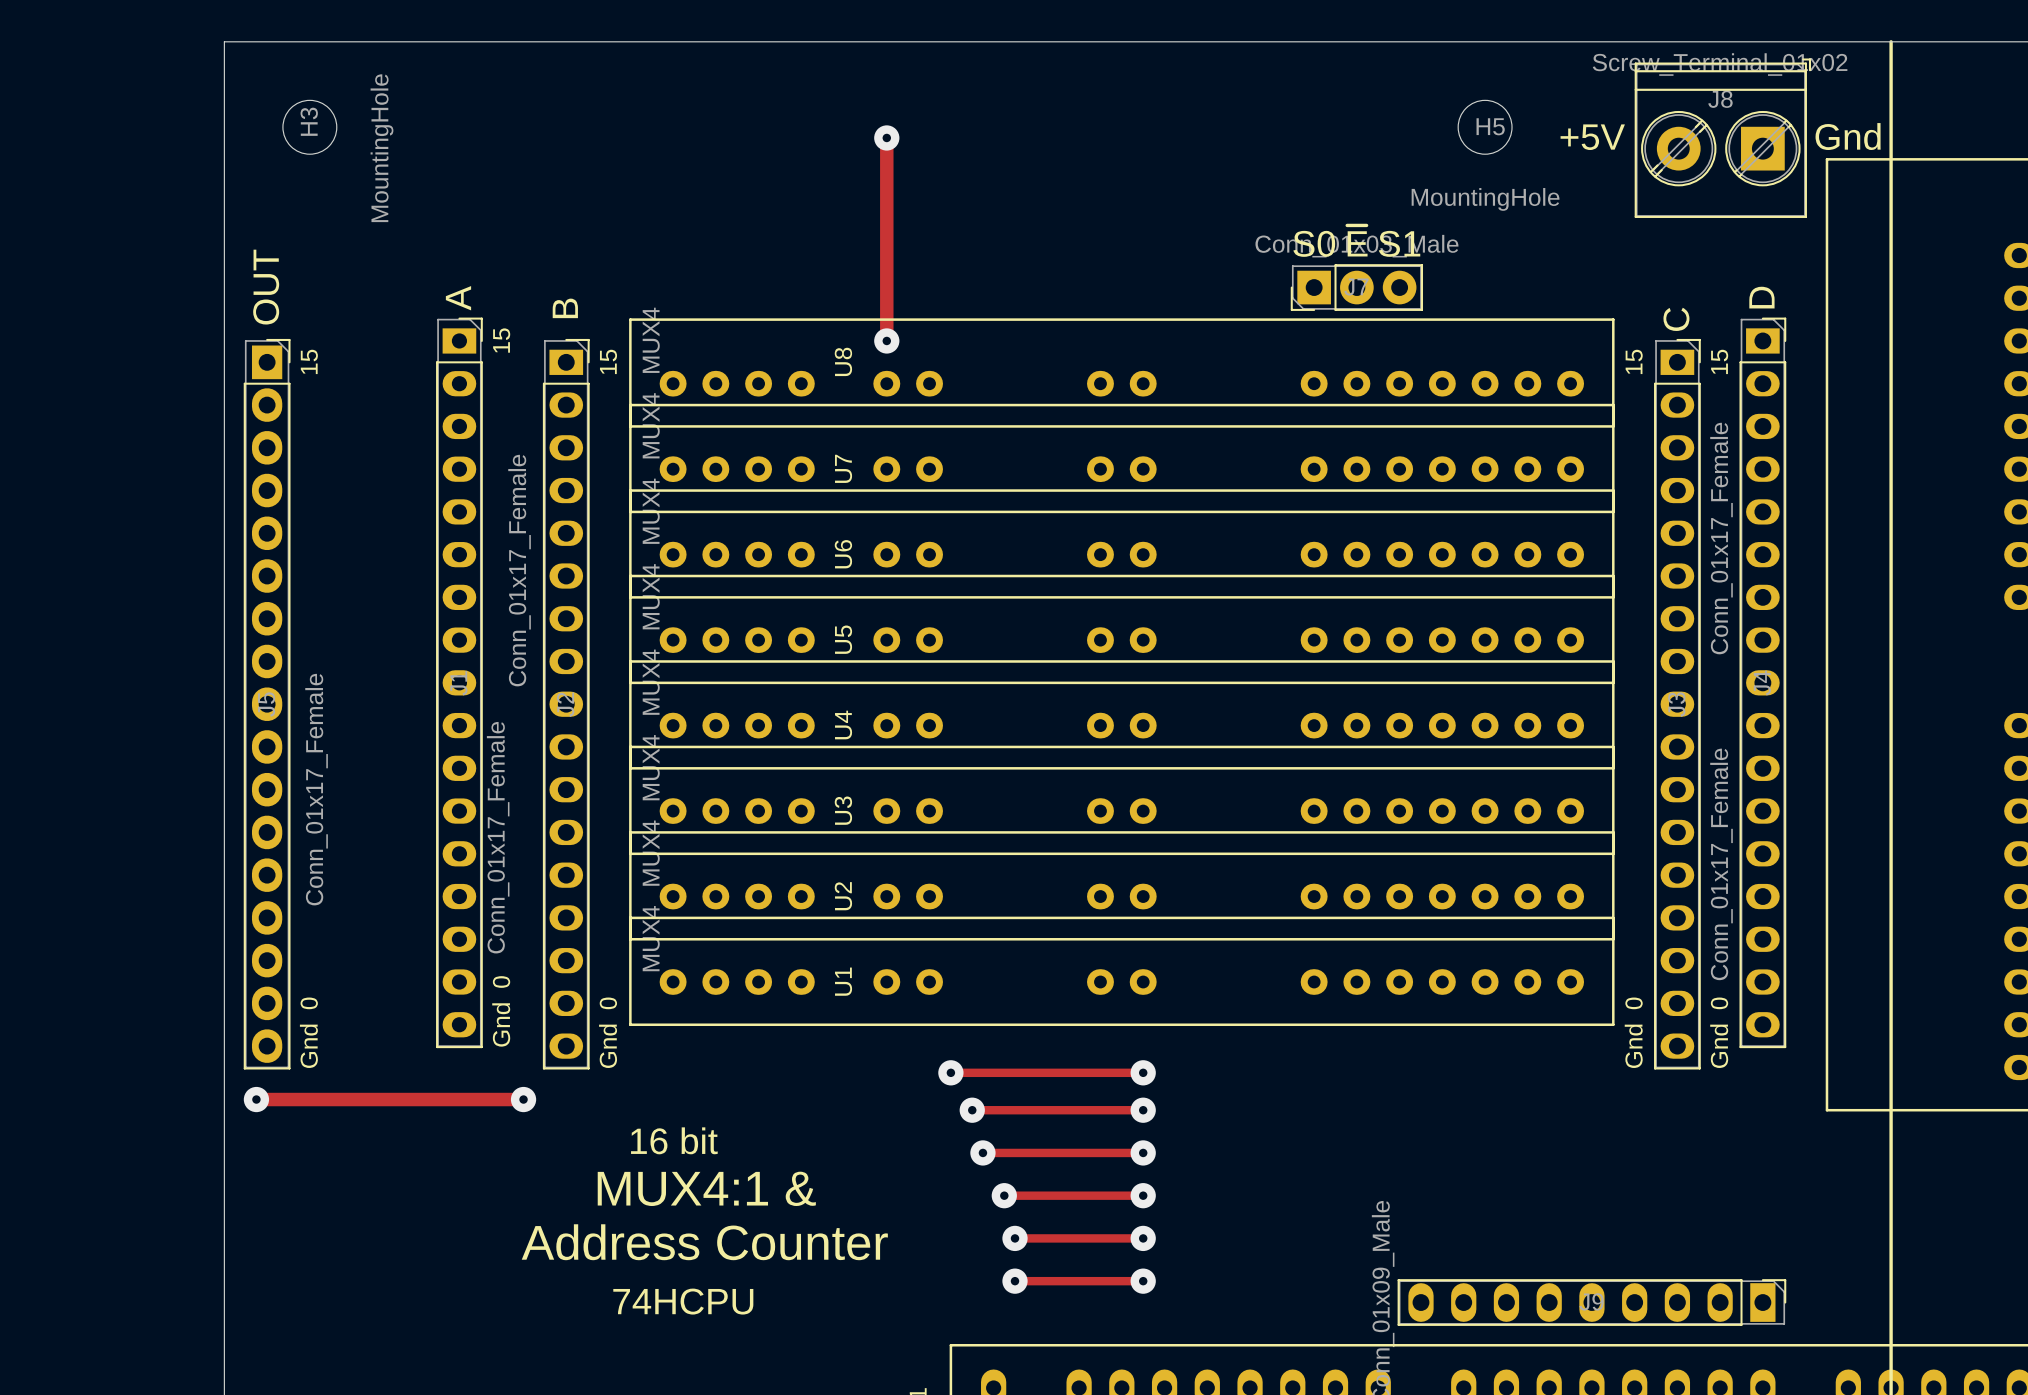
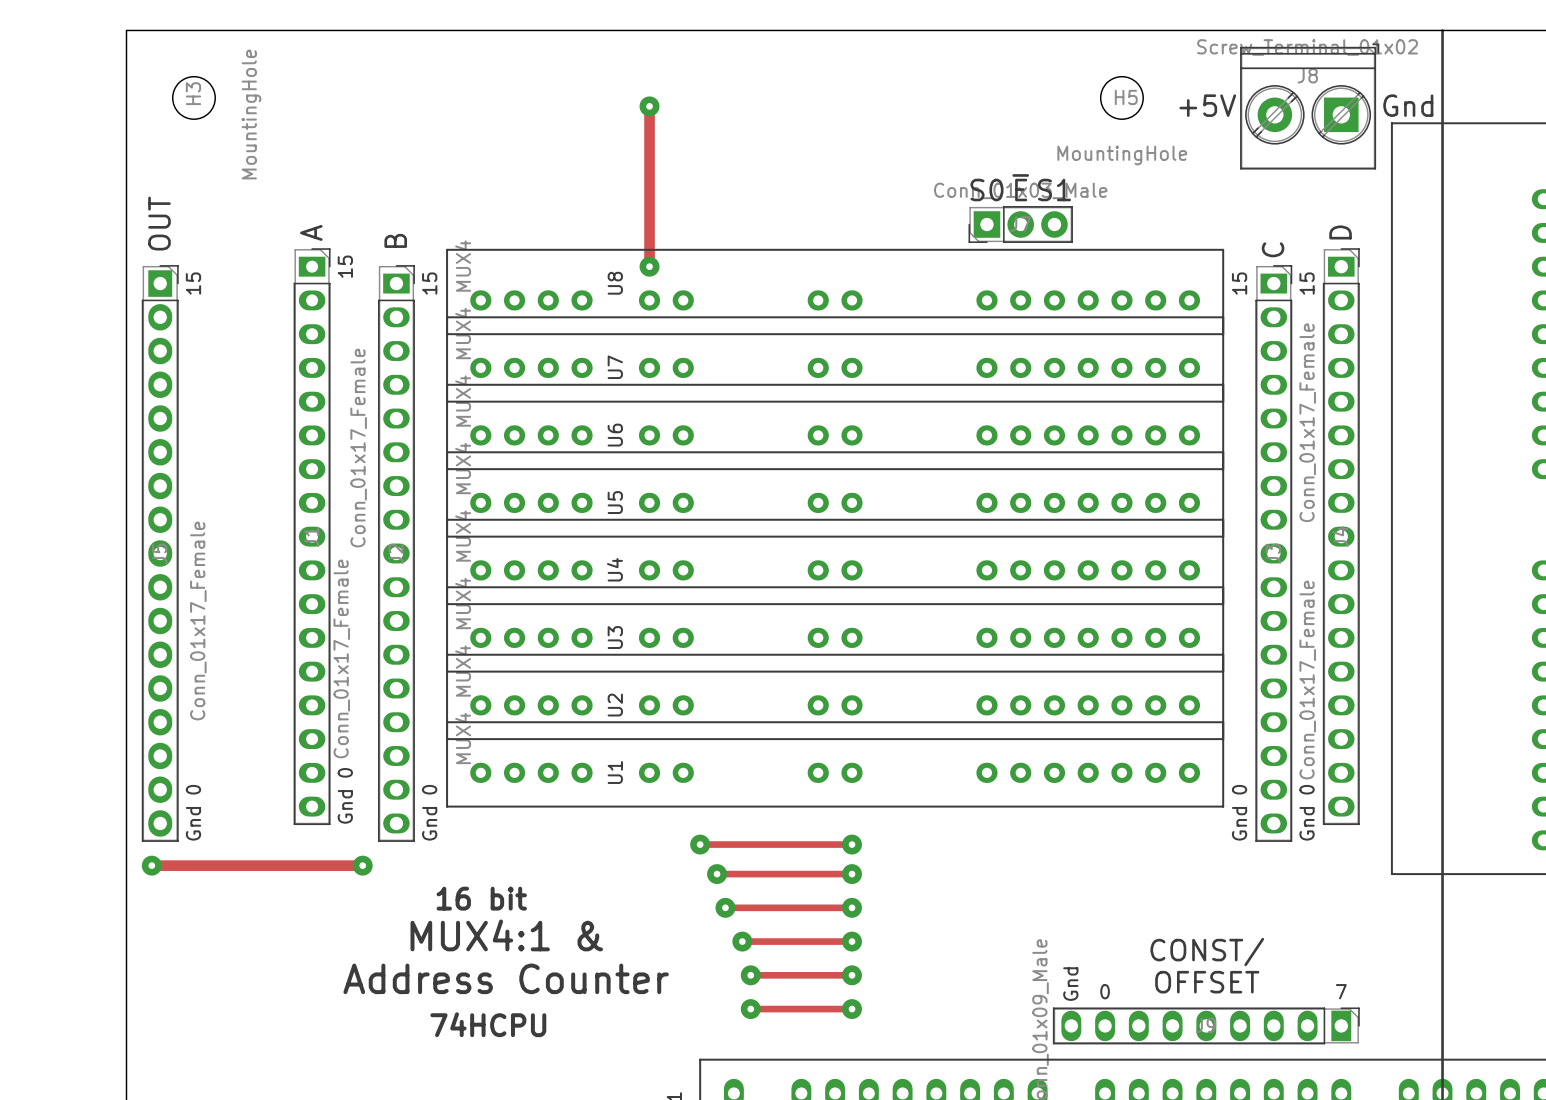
text: none -> CONST/ (1207, 951)
text: none -> OFFSET (1207, 982)
text: none -> Gnd (1070, 984)
text: none -> 0 (1105, 991)
text: none -> 7 (1341, 991)

